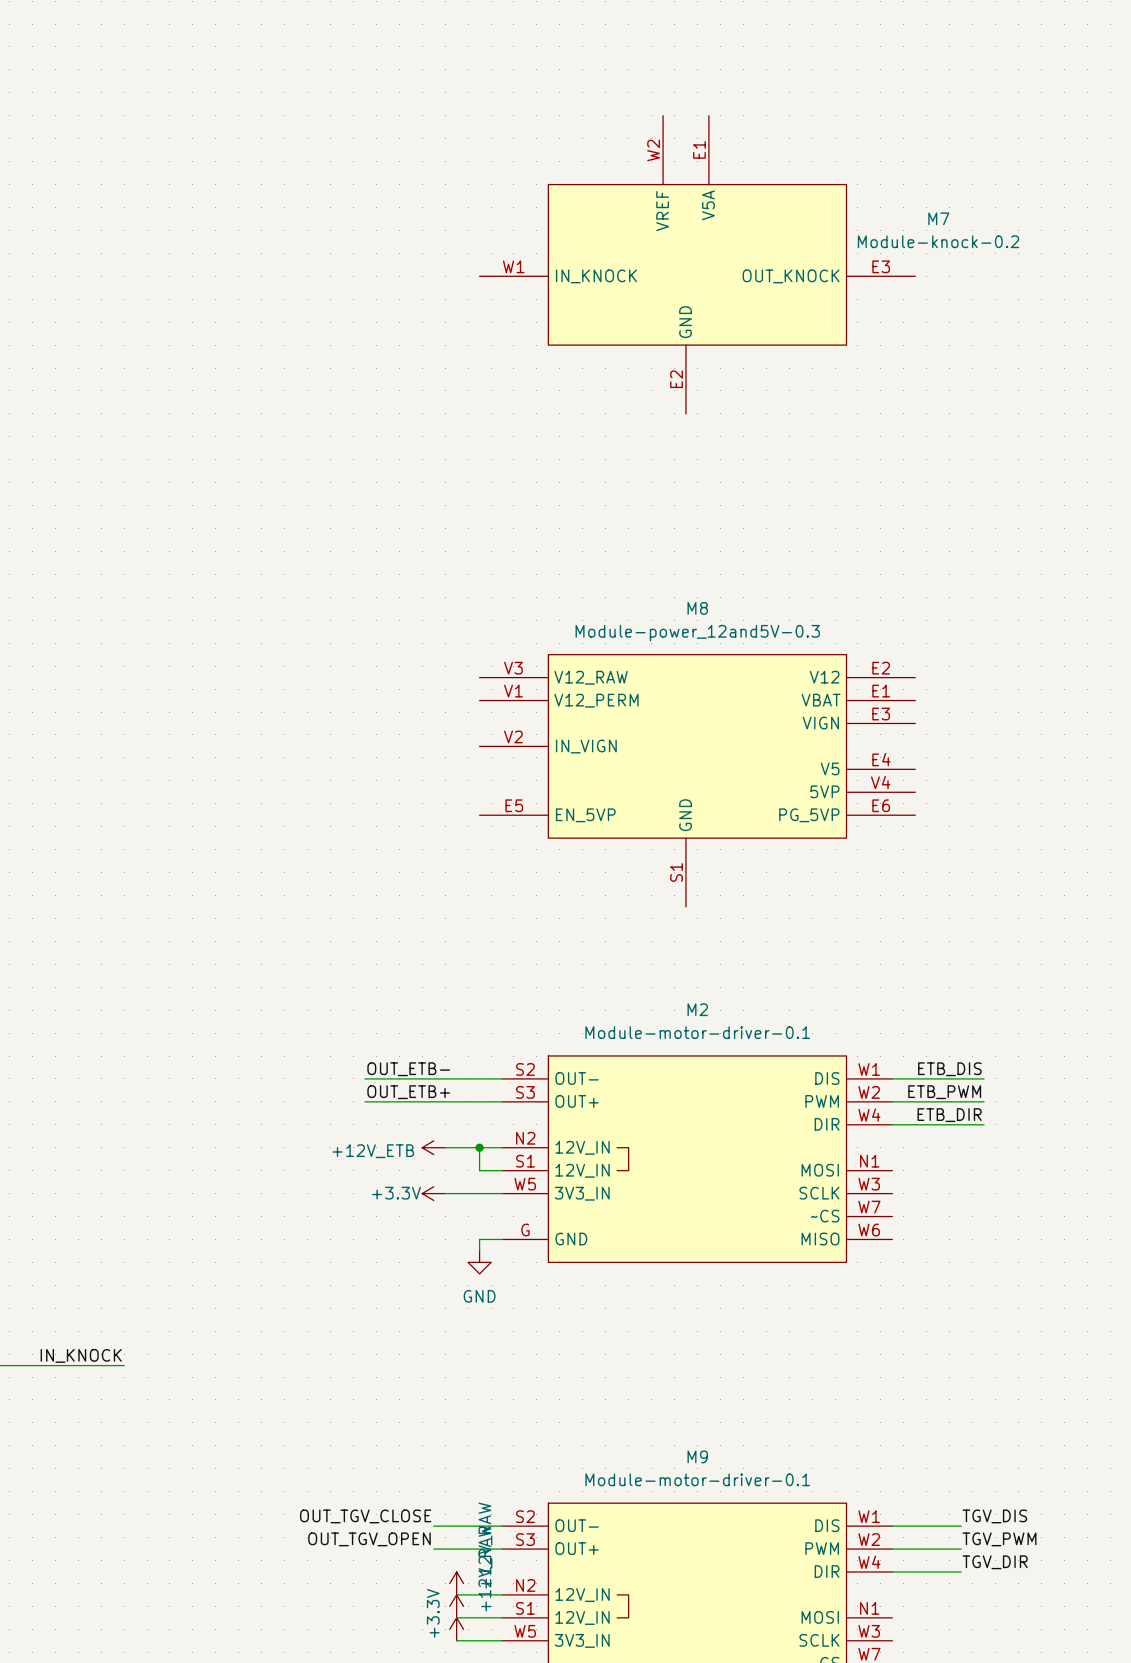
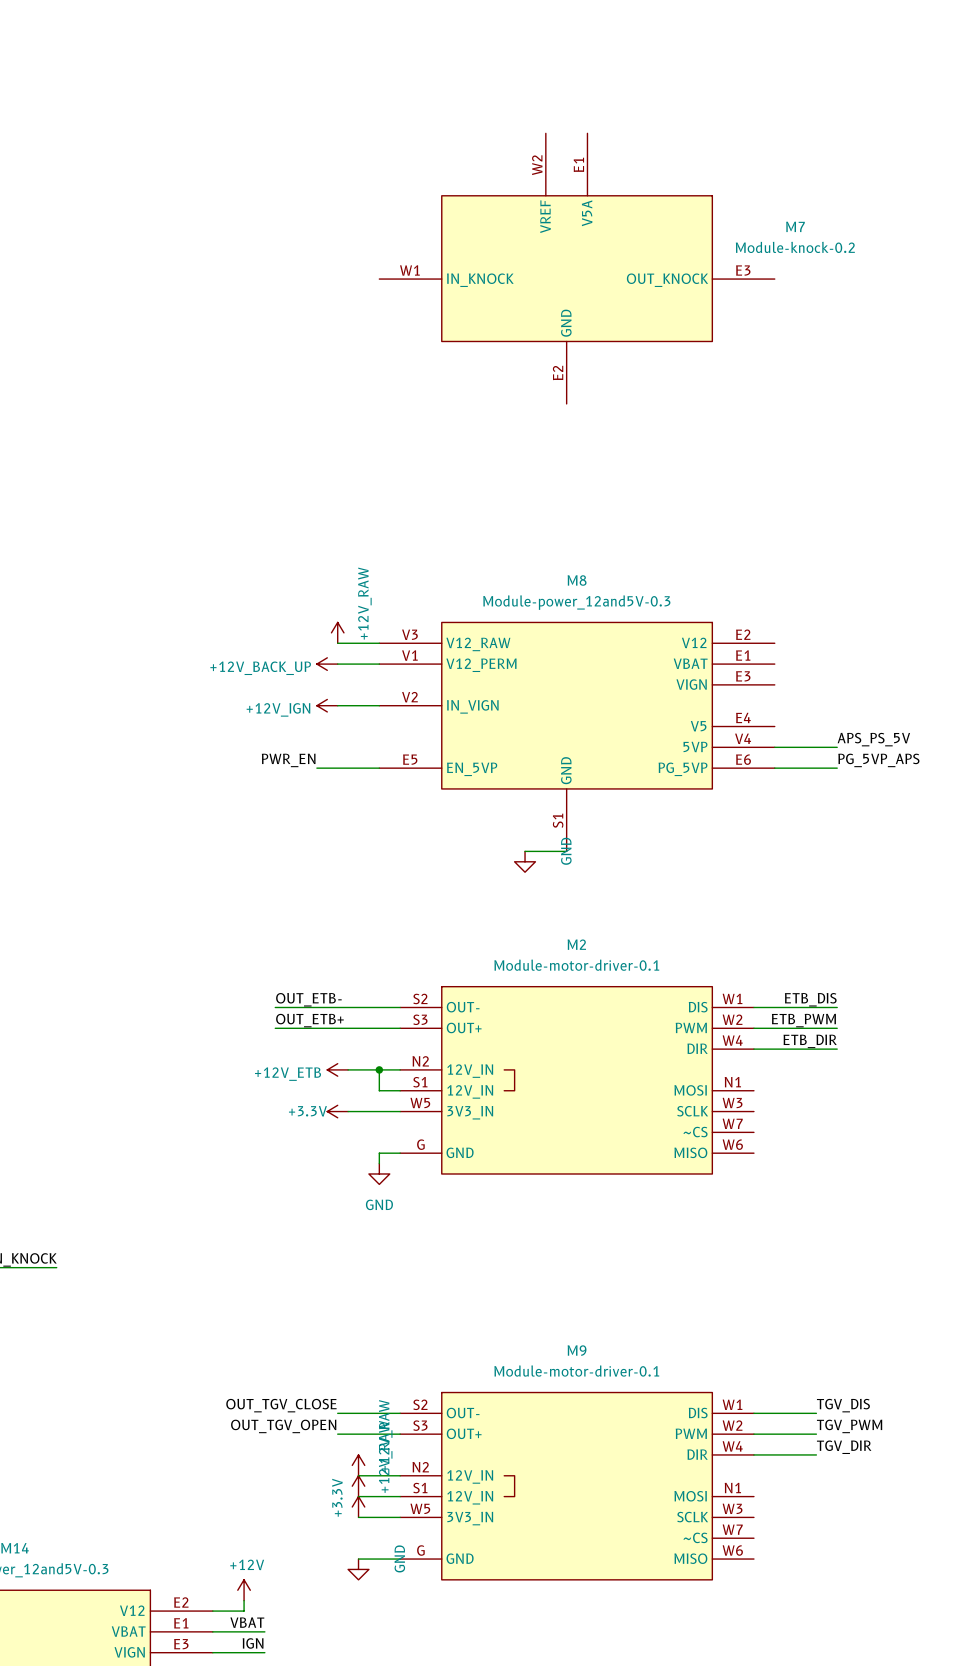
power symbol: none -> +12V_RAW (337, 632)
wire: none -> (337, 643) (379, 643)
power symbol: none -> +12V_BACK_UP (327, 664)
wire: none -> (337, 664) (379, 664)
power symbol: none -> +12V_IGN (327, 705)
wire: none -> (337, 705) (379, 705)
label: none -> APS_PS_5V (873, 739)
wire: none -> (774, 747) (837, 747)
label: none -> PWR_EN (288, 760)
label: none -> PG_5VP_APS (878, 760)
wire: none -> (316, 768) (379, 768)
wire: none -> (774, 768) (837, 768)
wire: none -> (525, 851) (566, 851)
power symbol: none -> GND (525, 861)

